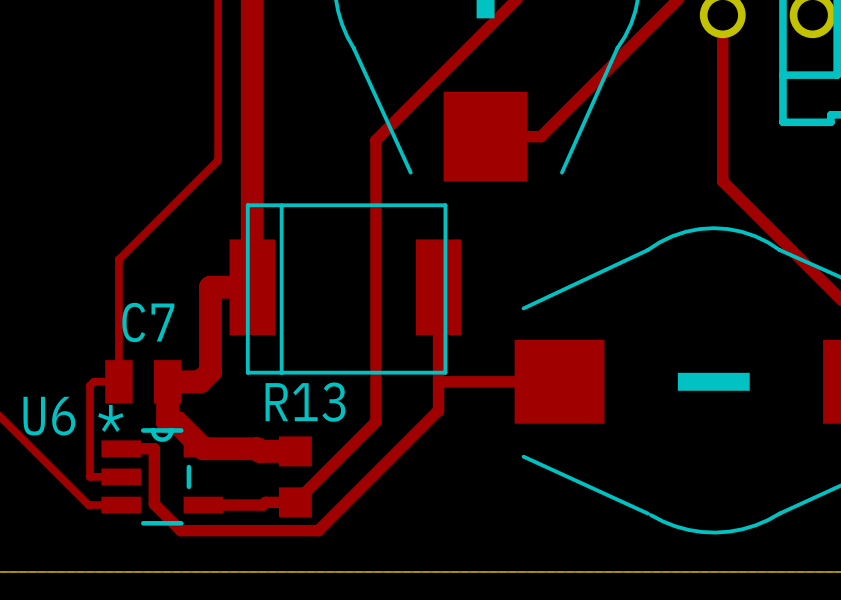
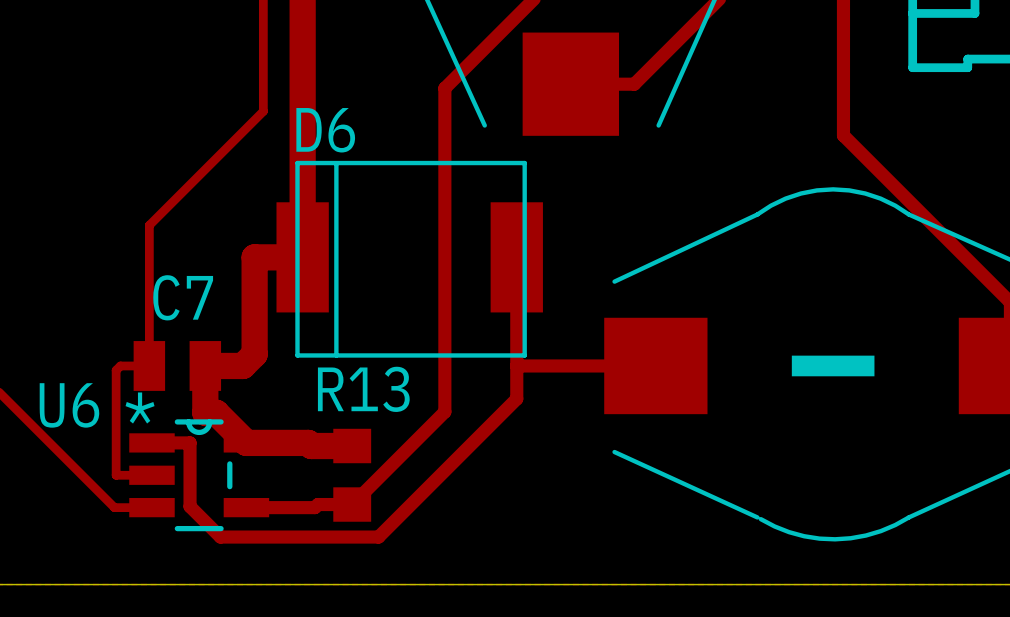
D6 name: none -> D6 (325, 130)

